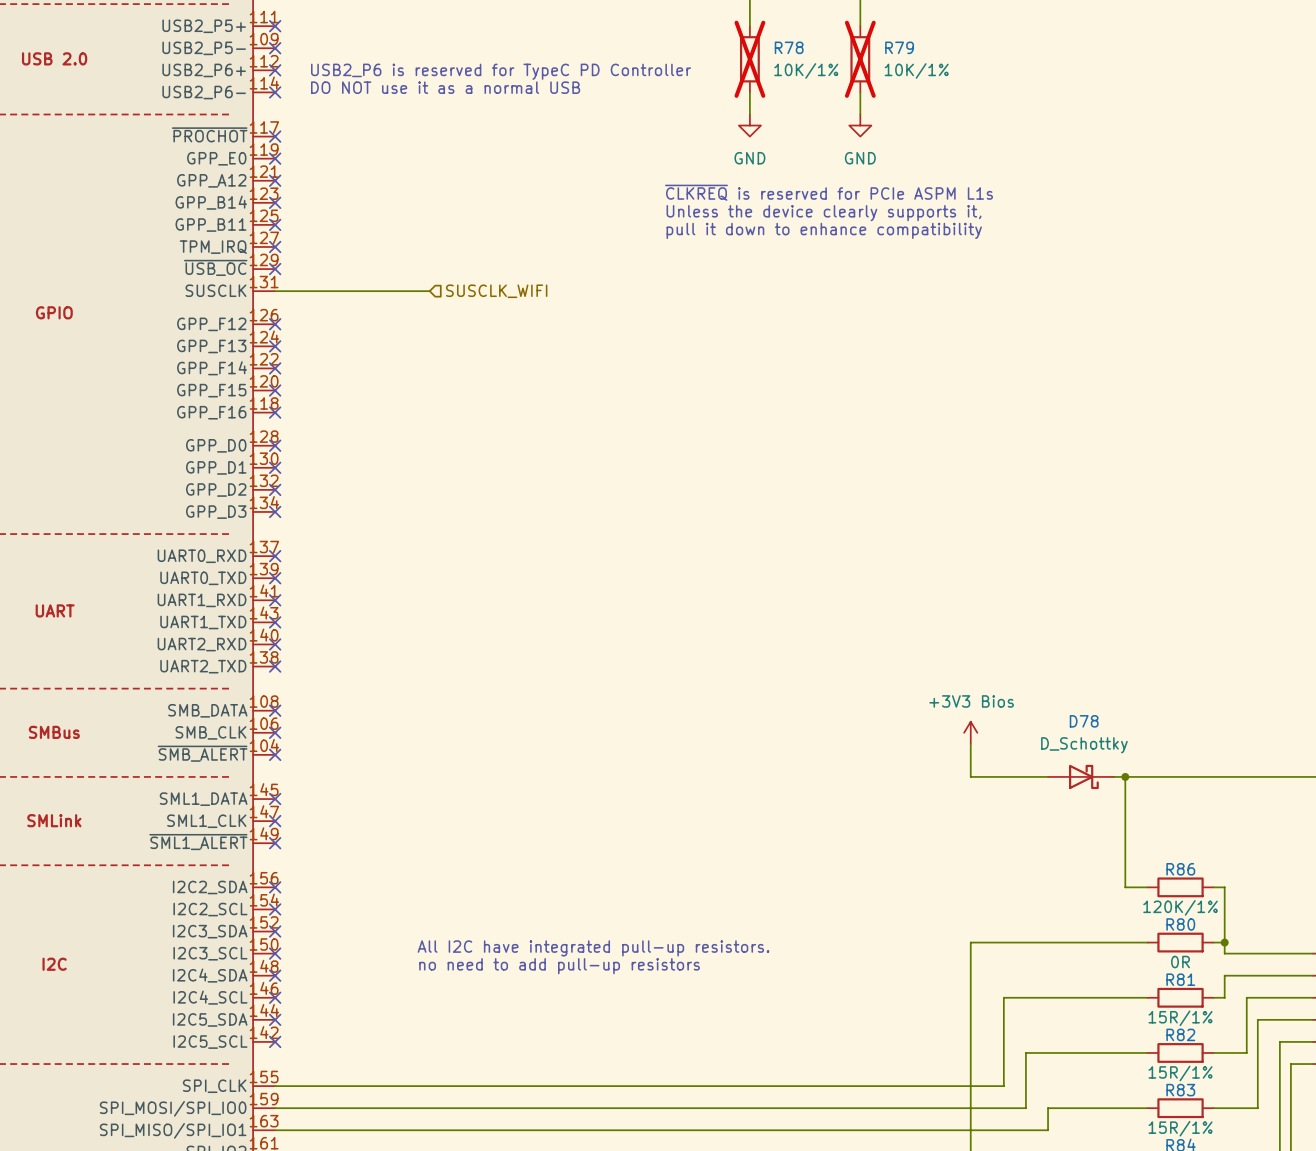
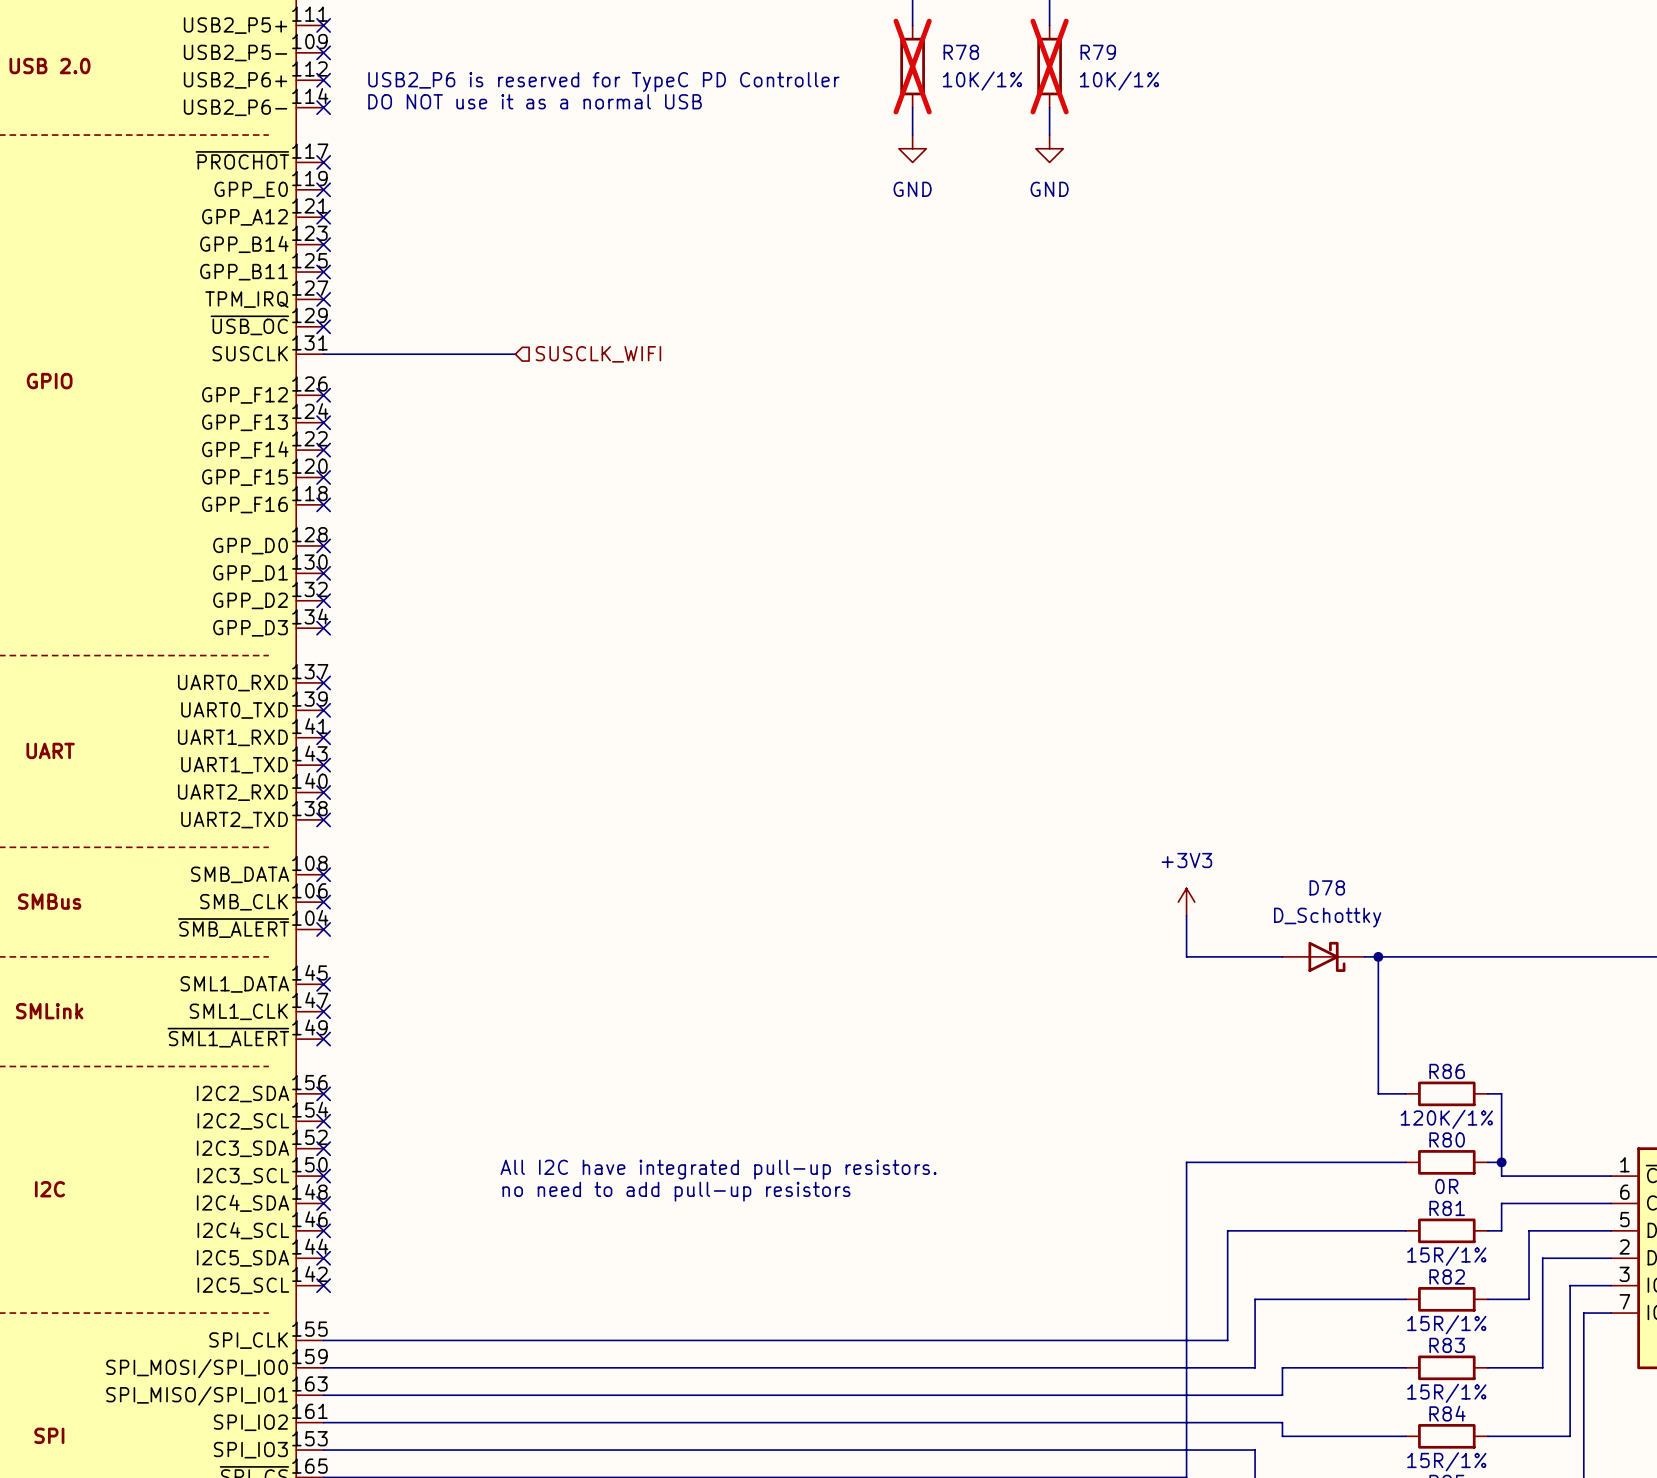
text: ~{CLKREQ} is reserved for PCIe ASPM L1s (829, 192) -> none
text: Unless the device clearly supports it, (823, 213) -> none
text: pull it down to enhance compatibility (824, 230) -> none
power symbol: +3V3 Bios (970, 732) -> +3V3 (1186, 902)

